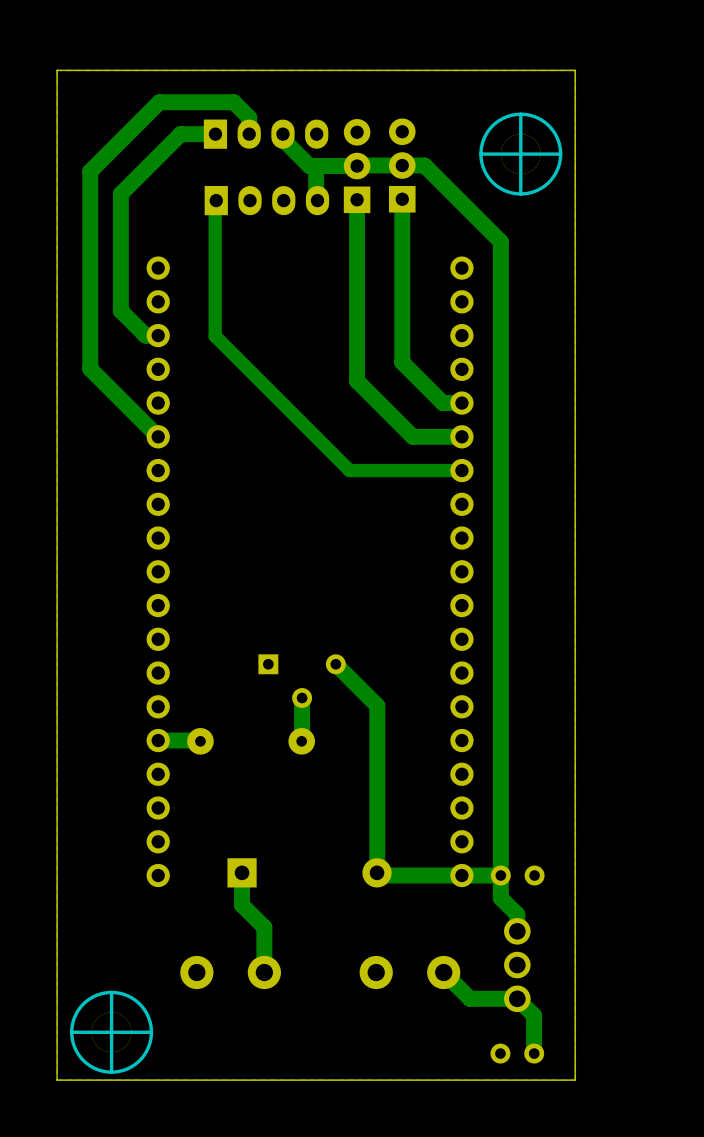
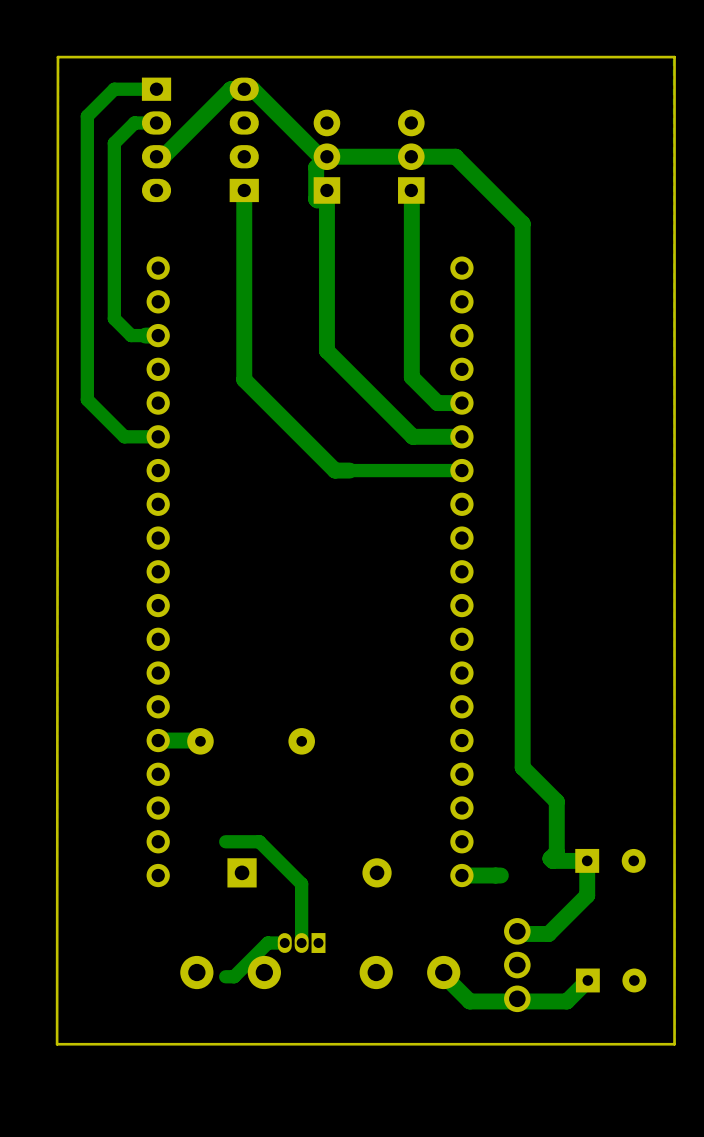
board edge: (575, 70) (57, 70) (57, 1080) (575, 1080) (575, 70) -> (674, 57) (674, 1044) (57, 1044) (57, 57) (674, 57)
track: (215, 134) (180, 134) (120, 193) (120, 310) (145, 335) -> (156, 122) (134, 122) (114, 143) (114, 318) (131, 335) (145, 335)
track: (249, 134) (249, 117) (233, 102) (159, 102) (90, 171) (90, 368) (158, 436) -> (156, 89) (114, 89) (87, 116) (87, 399) (124, 436) (158, 436)
part rotation: 0° (266, 134) -> 90° counterclockwise (244, 139)
track: (282, 134) (282, 139) (309, 166) (424, 165) (500, 241) (500, 898) (517, 914) (517, 931) -> none
part: none -> (156, 139)
part: (520, 154) -> none
track: none -> (156, 156) (163, 156) (230, 89) (252, 89) (320, 156) (455, 156) (522, 223) (522, 767) (556, 801) (556, 852) (550, 858) (552, 860) (587, 860) (587, 895) (548, 933) (518, 933)
part position: (402, 165) -> (411, 156)
part position: (357, 166) -> (326, 156)
track: (357, 199) (357, 381) -> (326, 190) (326, 350) (357, 381)
track: (402, 199) (402, 362) (442, 403) -> (411, 190) (411, 377) (437, 403) (442, 403)
track: (216, 200) (215, 336) (349, 470) -> (244, 190) (244, 379) (335, 470) (349, 470)
part: (266, 200) -> none
track: (335, 664) (377, 705) (377, 872) (379, 875) (461, 875) -> none
part: (302, 681) -> none
track: (302, 698) (301, 741) -> none
track: none -> (225, 841) (259, 841) (301, 883) (301, 943)
part: none -> (610, 860)
track: (242, 872) (242, 905) (264, 927) (264, 972) -> none
part: (517, 875) -> none
track: none -> (284, 943) (267, 943) (234, 976) (225, 976)
part: none -> (301, 943)
track: (443, 972) (470, 998) (517, 998) (534, 1015) (534, 1053) -> none
track: none -> (445, 976) (469, 1001) (566, 1001) (587, 980)
part: none -> (611, 980)
part: (111, 1032) -> none
part: (517, 1053) -> none

